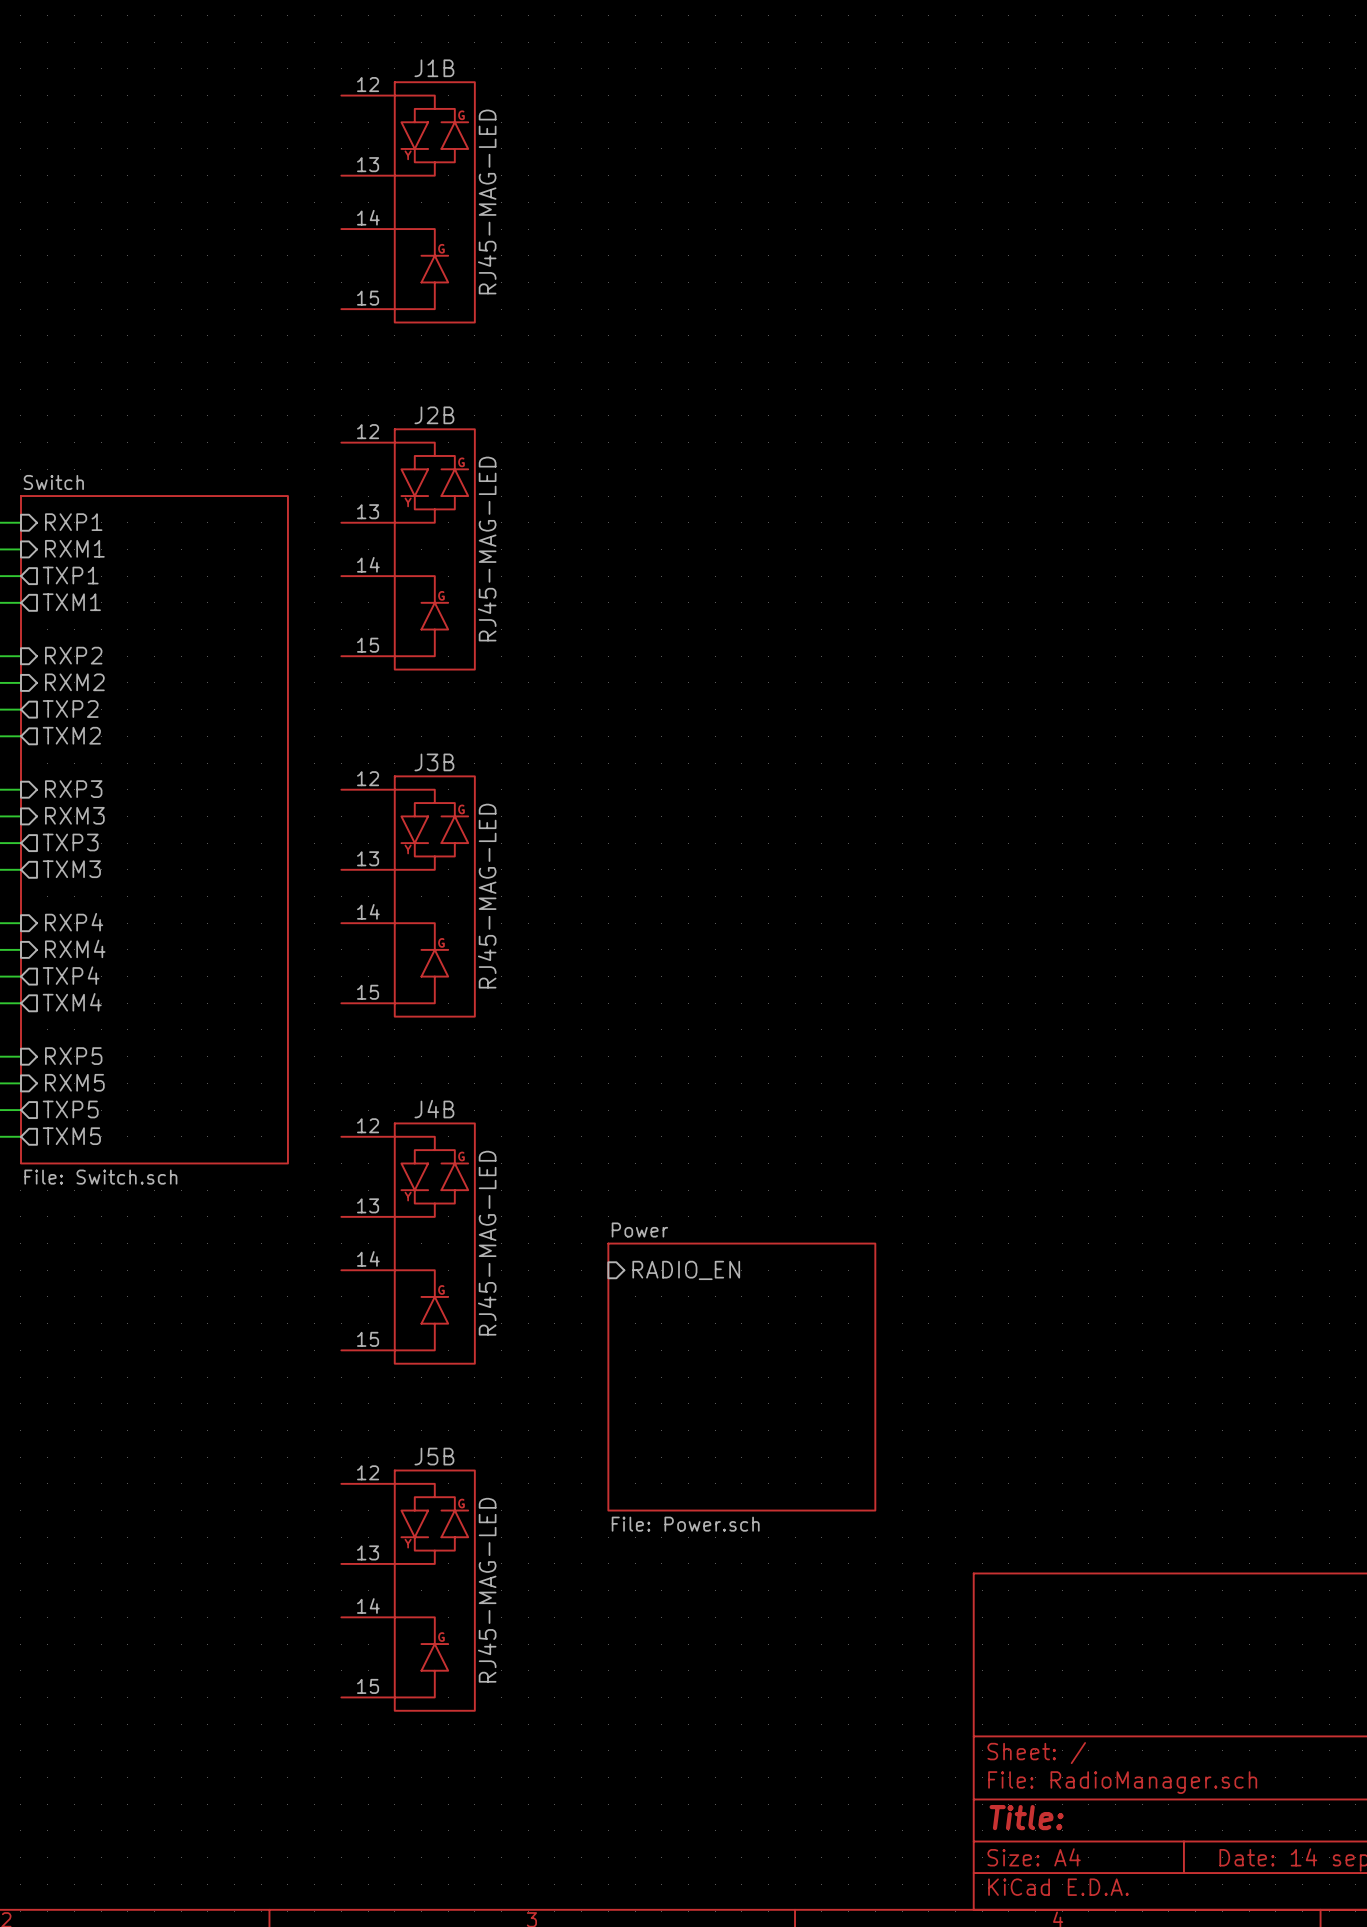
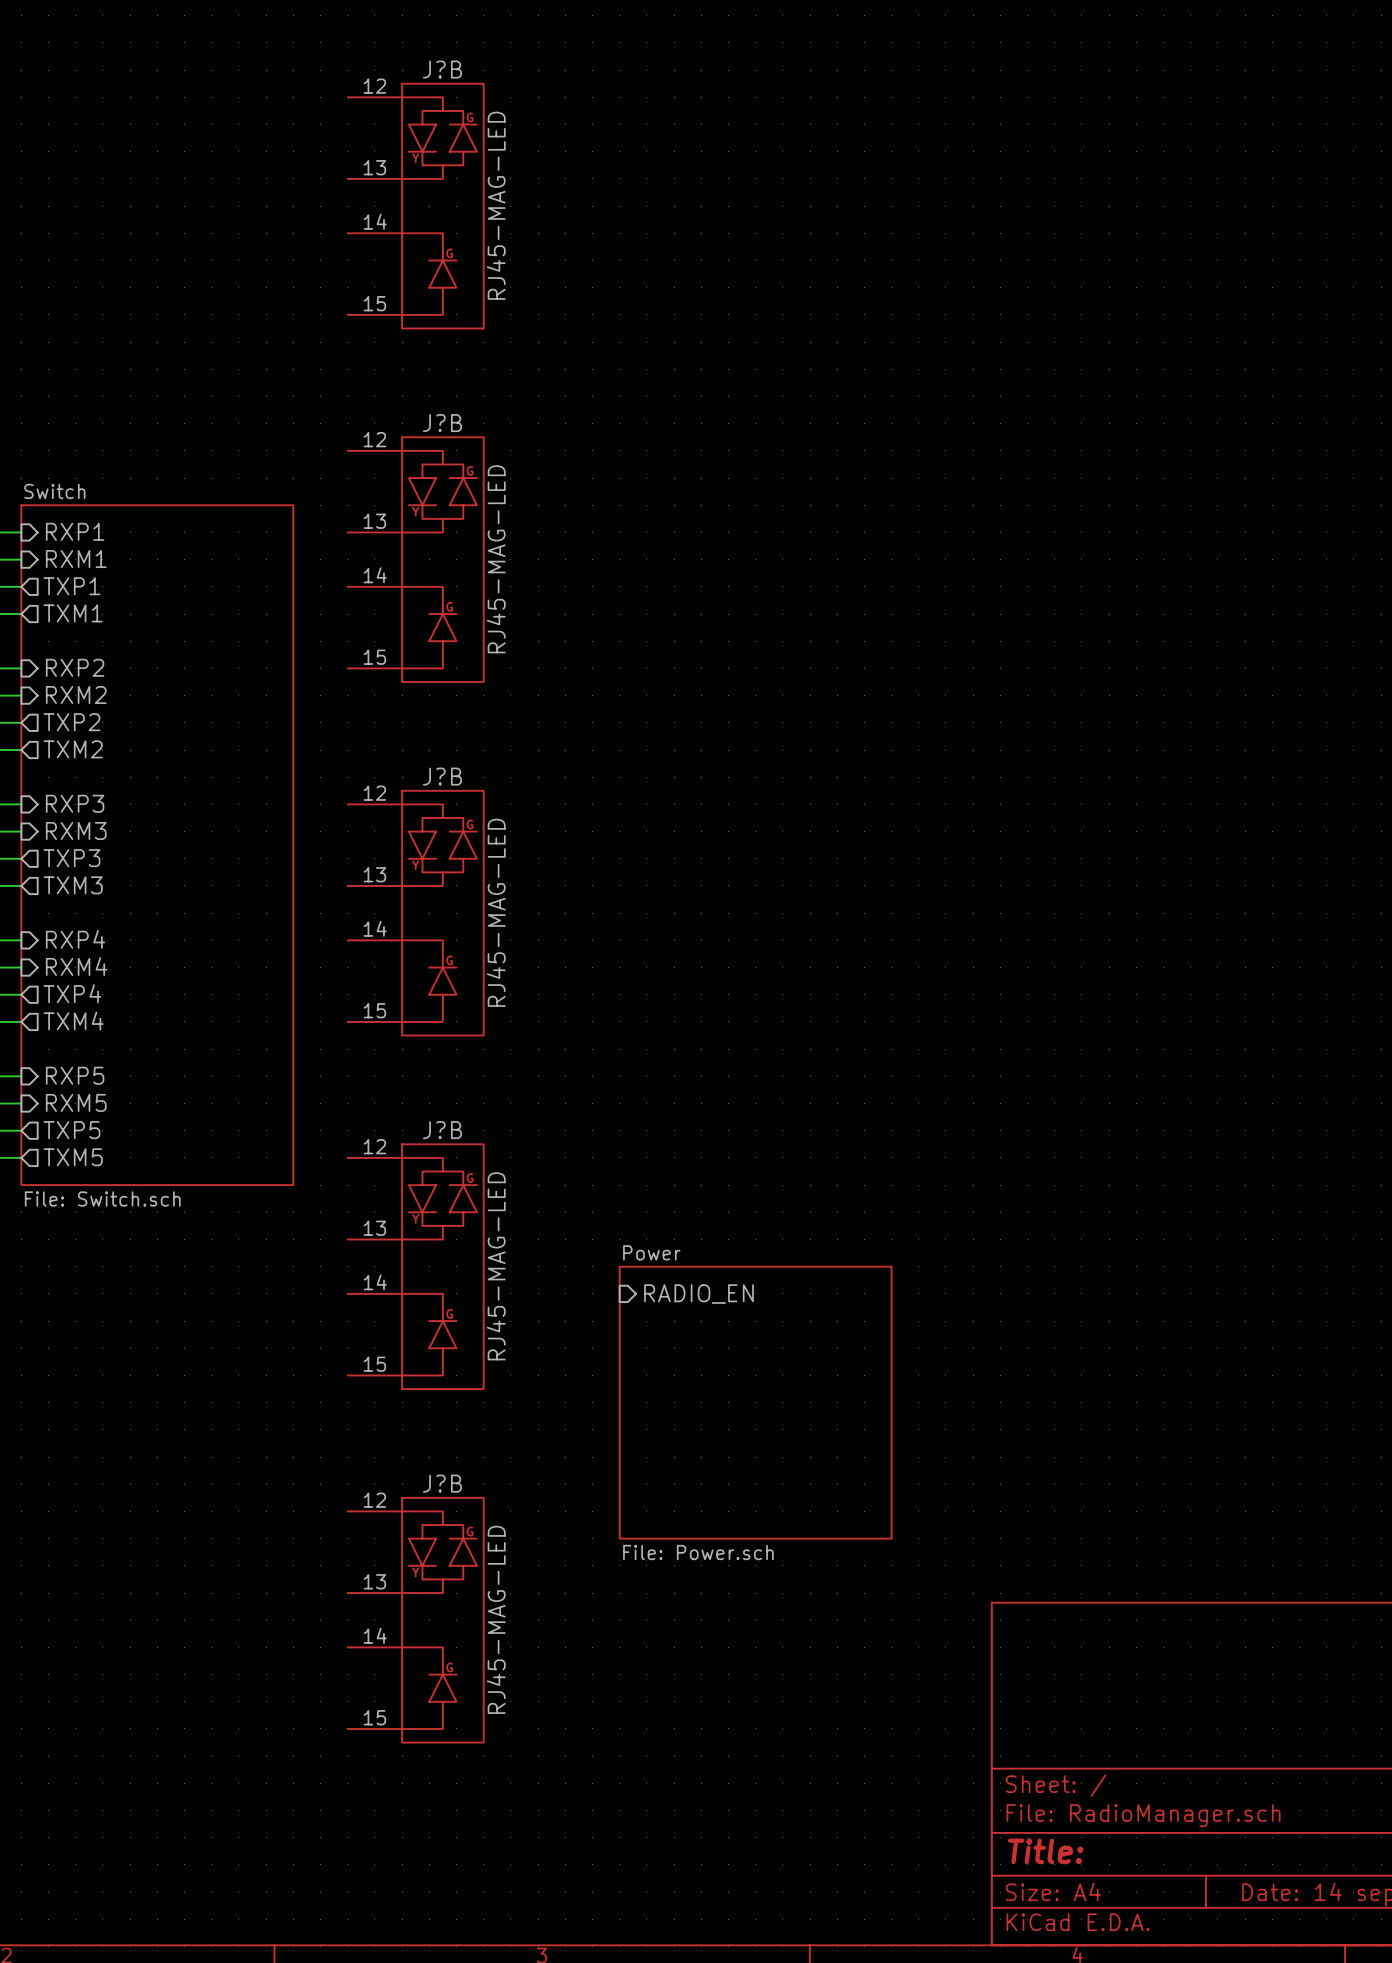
J1B name: J1B (434, 68) -> J?B (442, 69)
J2B name: J2B (434, 415) -> J?B (442, 423)
J3B name: J3B (434, 762) -> J?B (442, 776)
J4B name: J4B (434, 1109) -> J?B (442, 1130)
J5B name: J5B (434, 1456) -> J?B (442, 1483)

